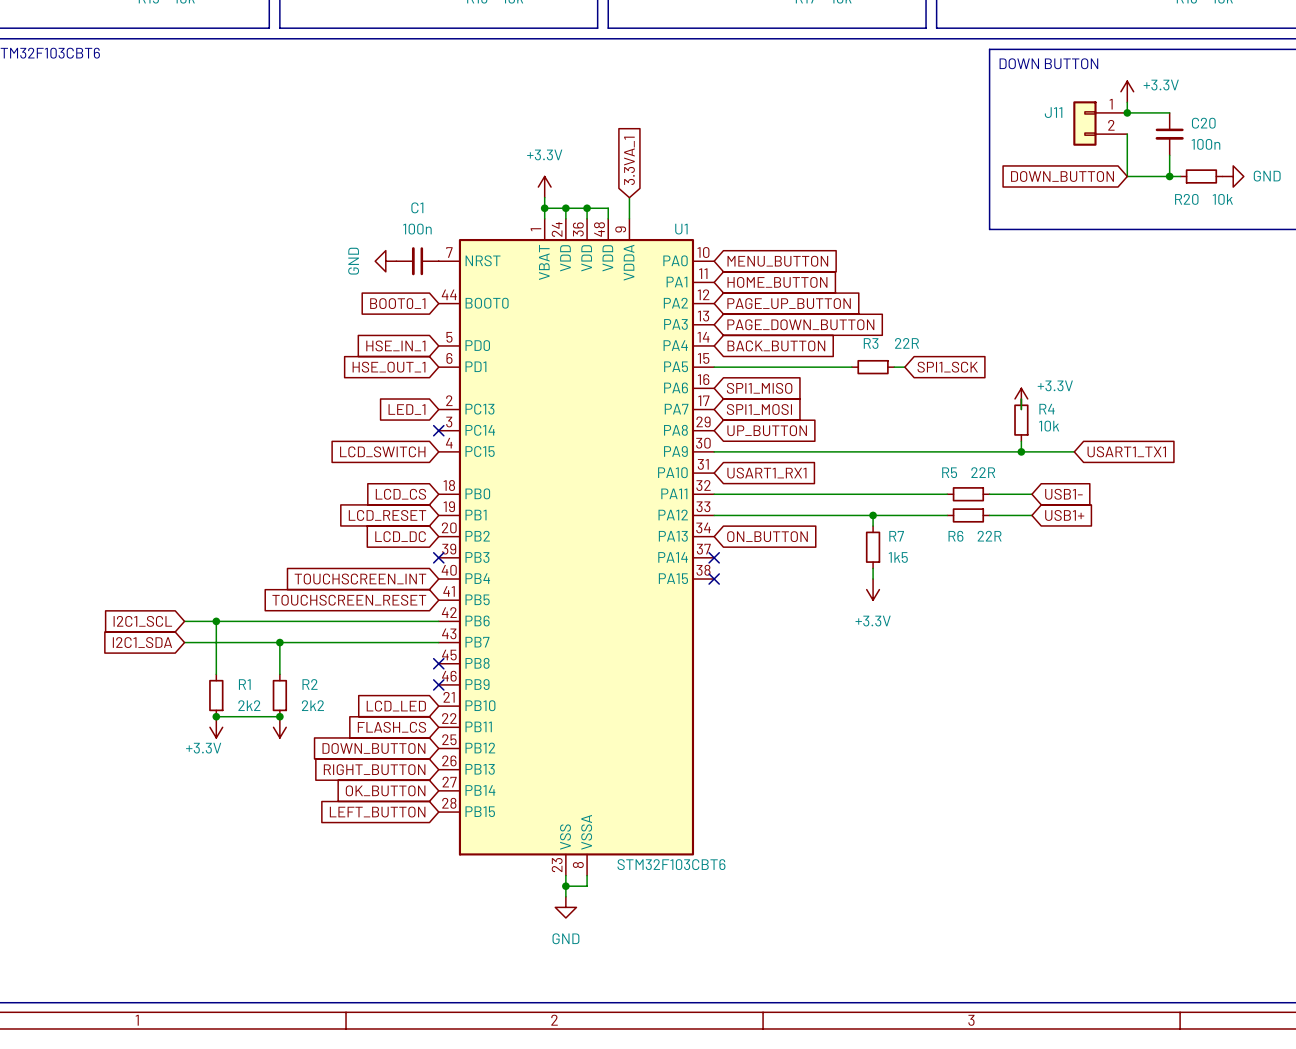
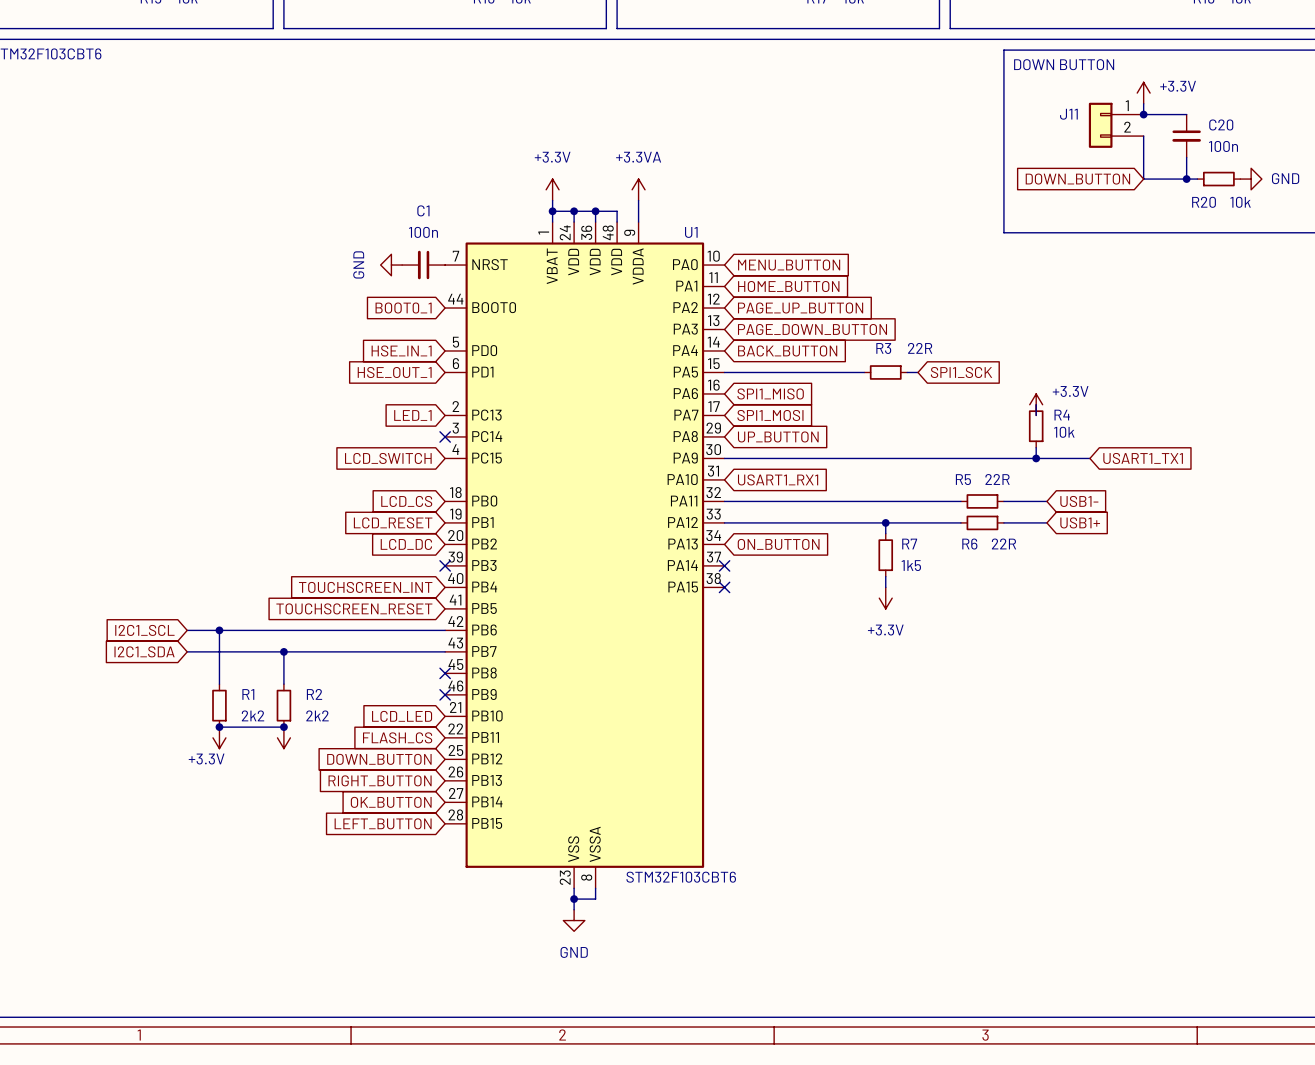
global label: 3.3VA_1 (629, 160) -> none
power symbol: none -> +3.3VA (638, 189)

